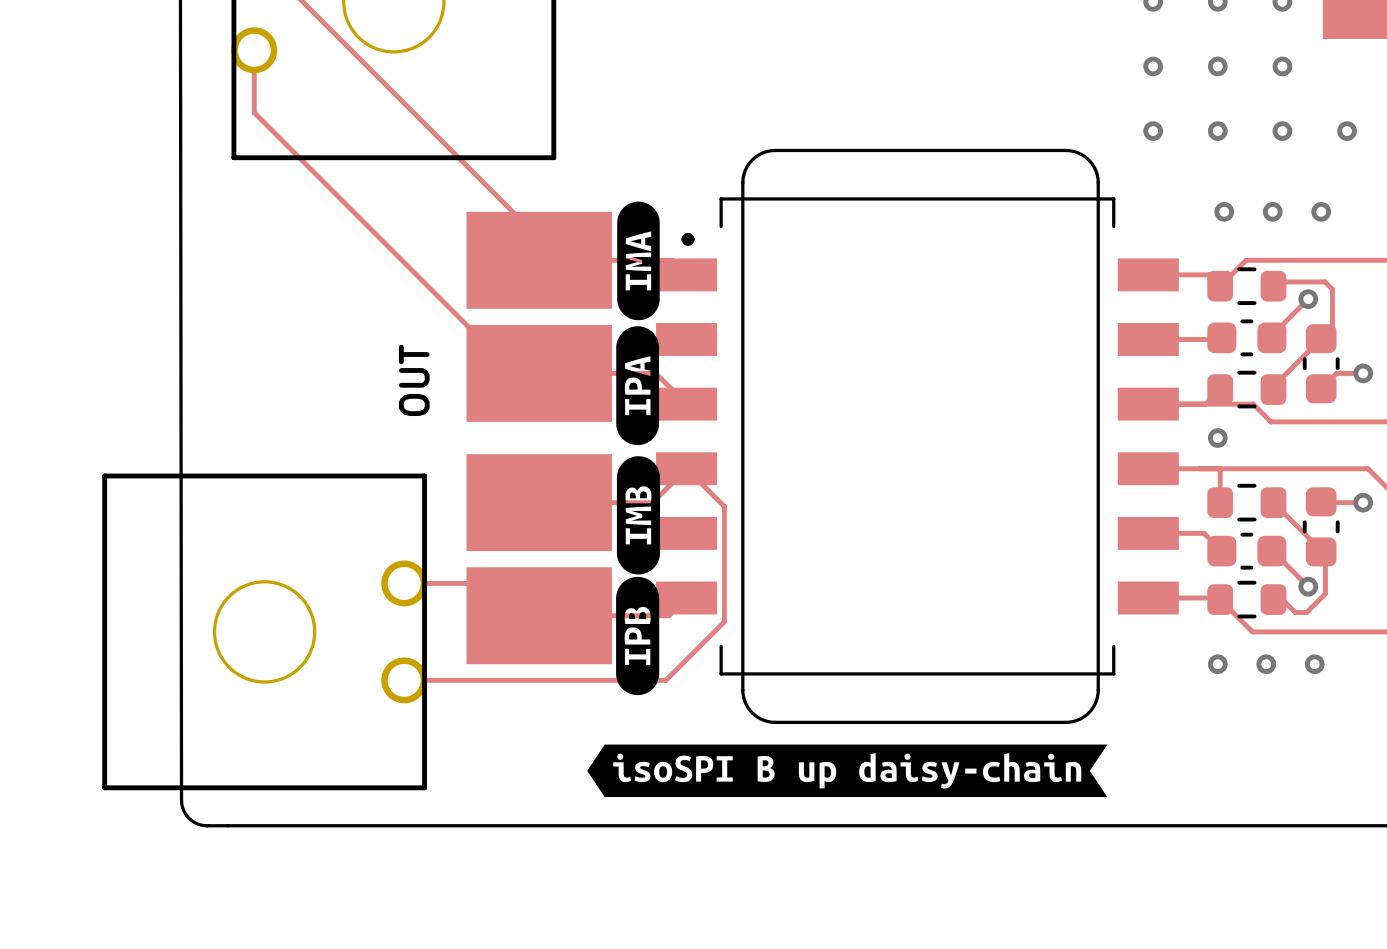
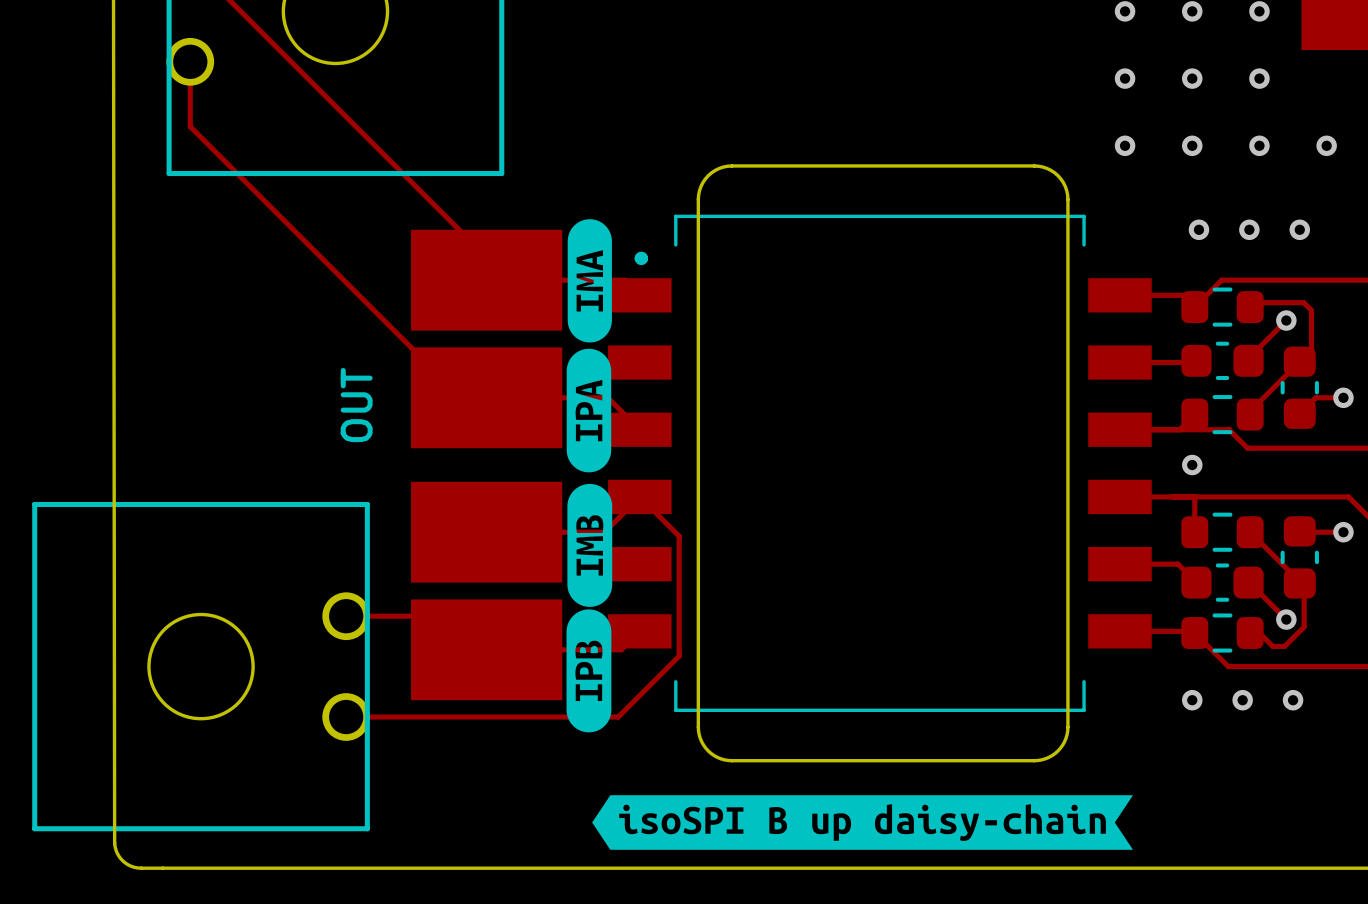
drawing position: (847, 770) -> (862, 822)

